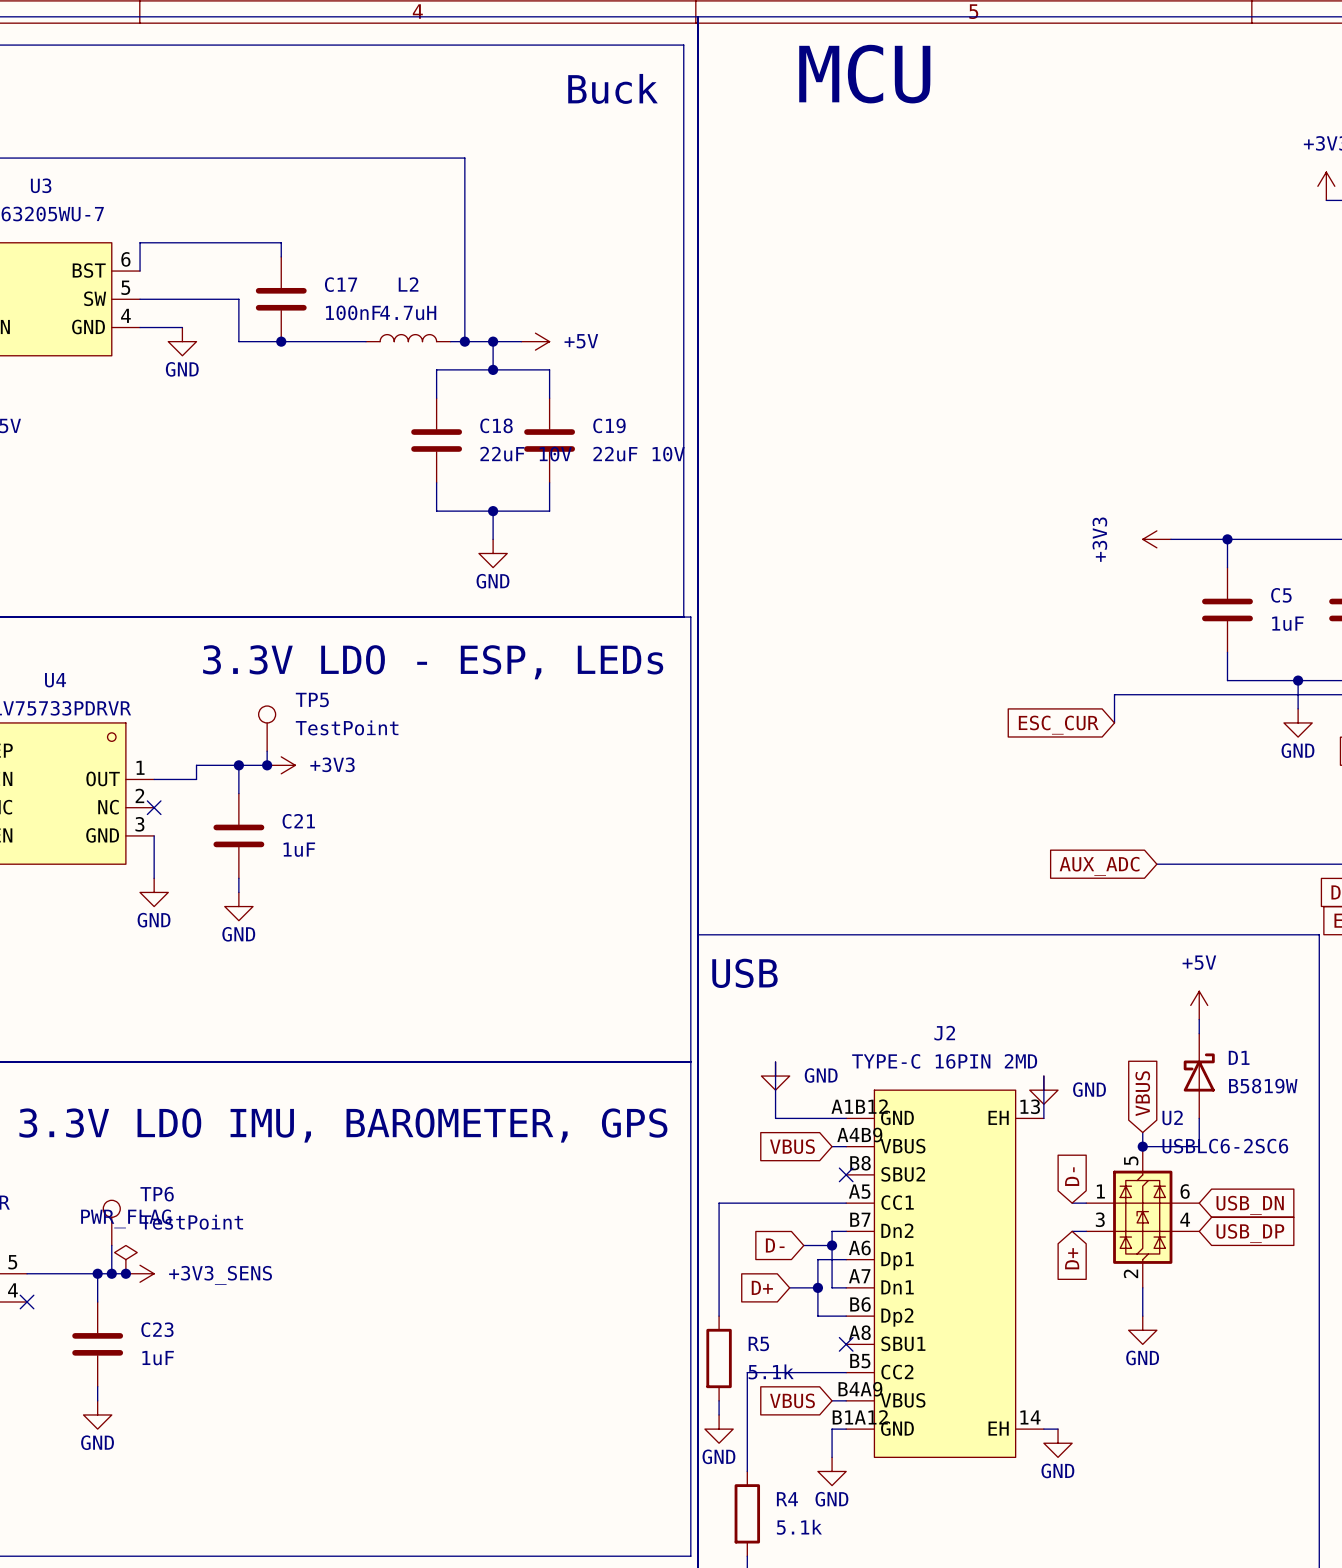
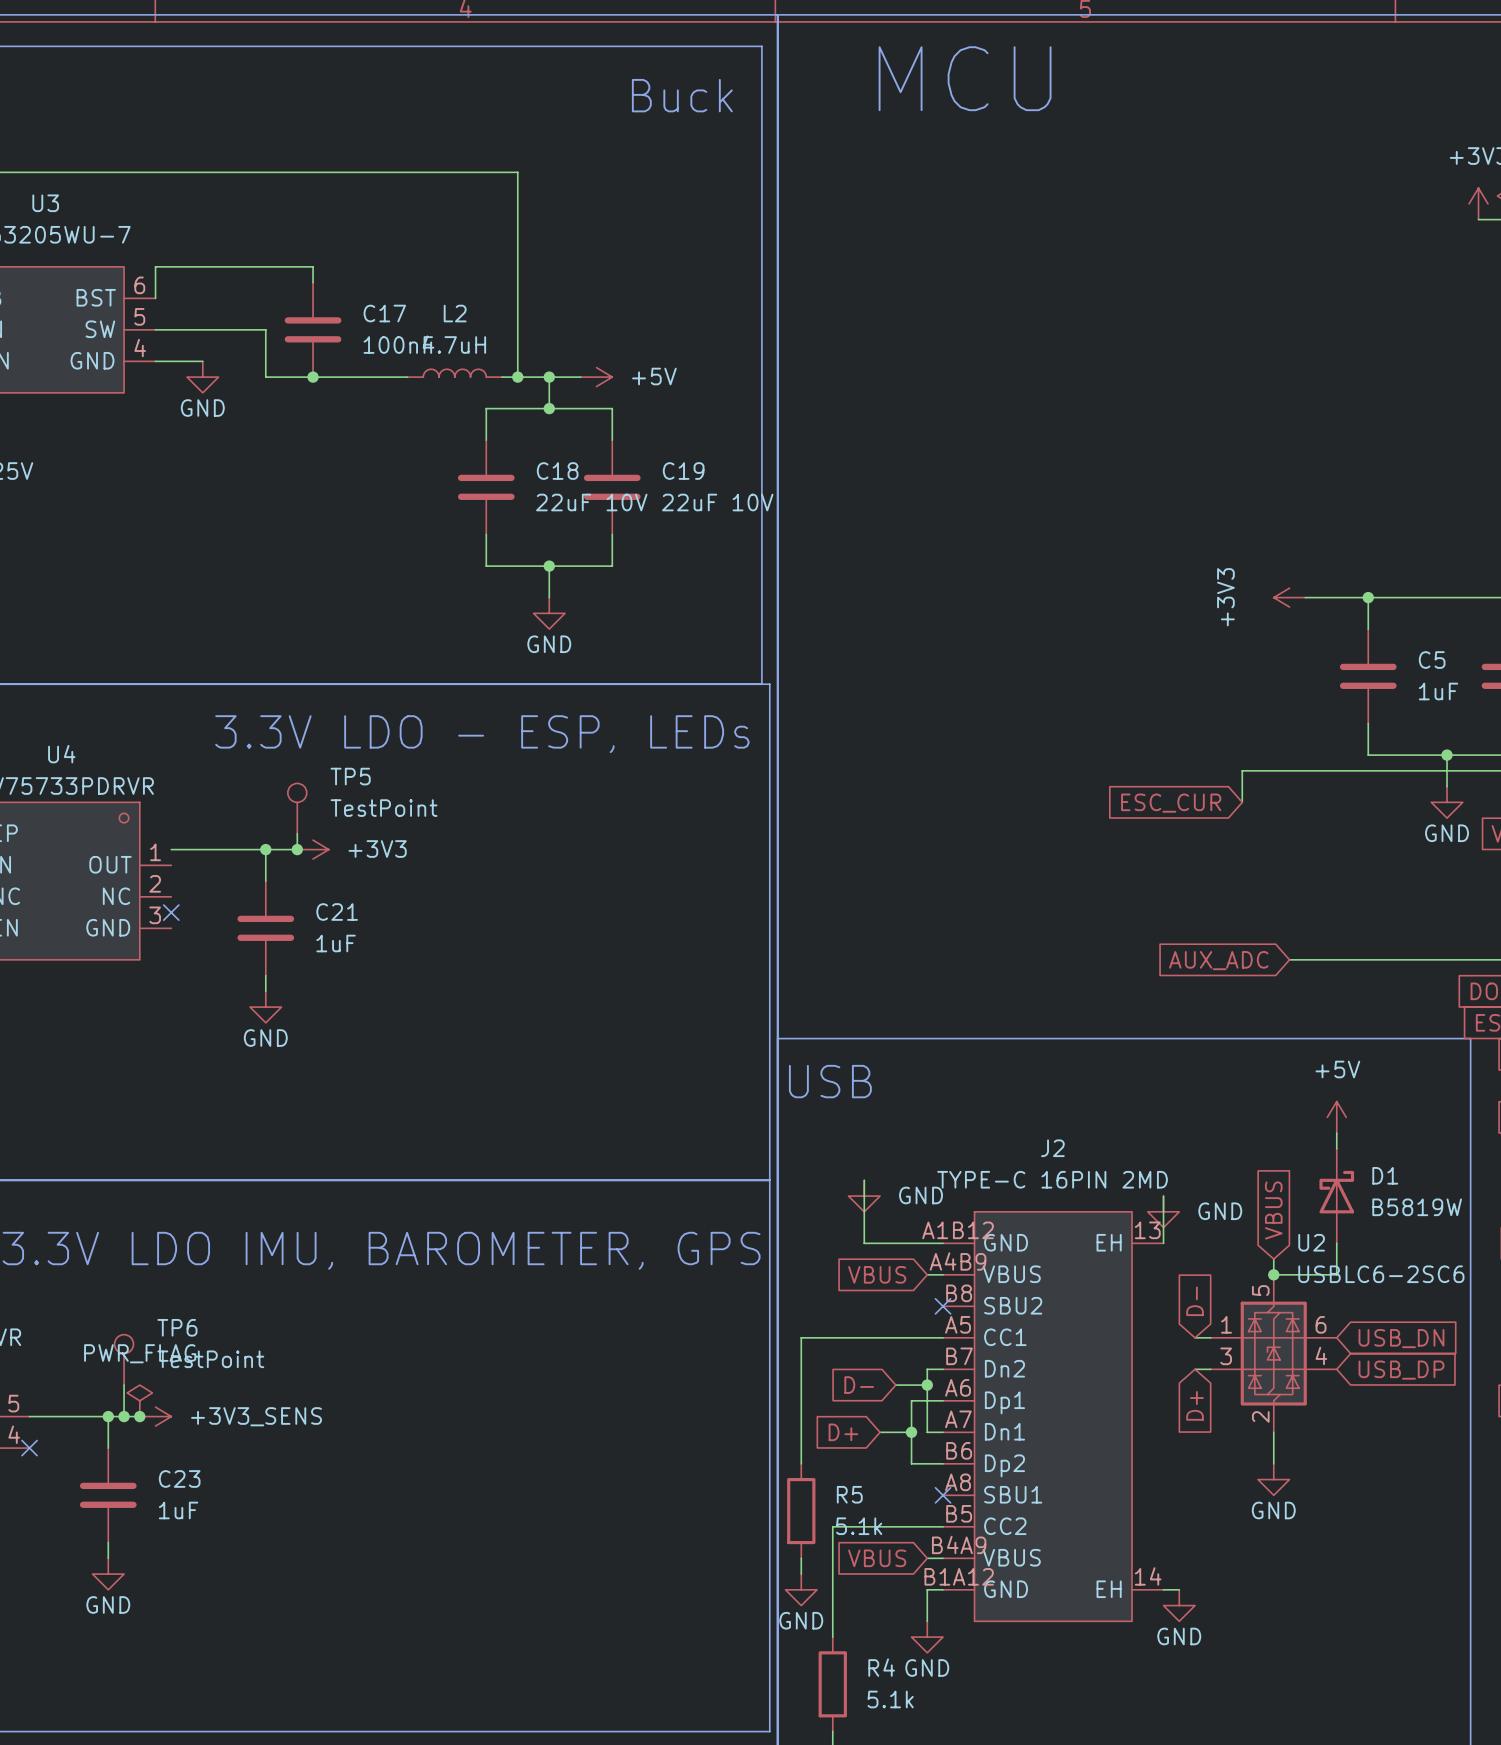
wire: (196, 765) (196, 779) (154, 779) -> (218, 849) (171, 849)
no-connect mark position: (154, 807) -> (171, 912)
wire: (154, 835) (154, 878) -> none
power symbol: GND (154, 892) -> none

